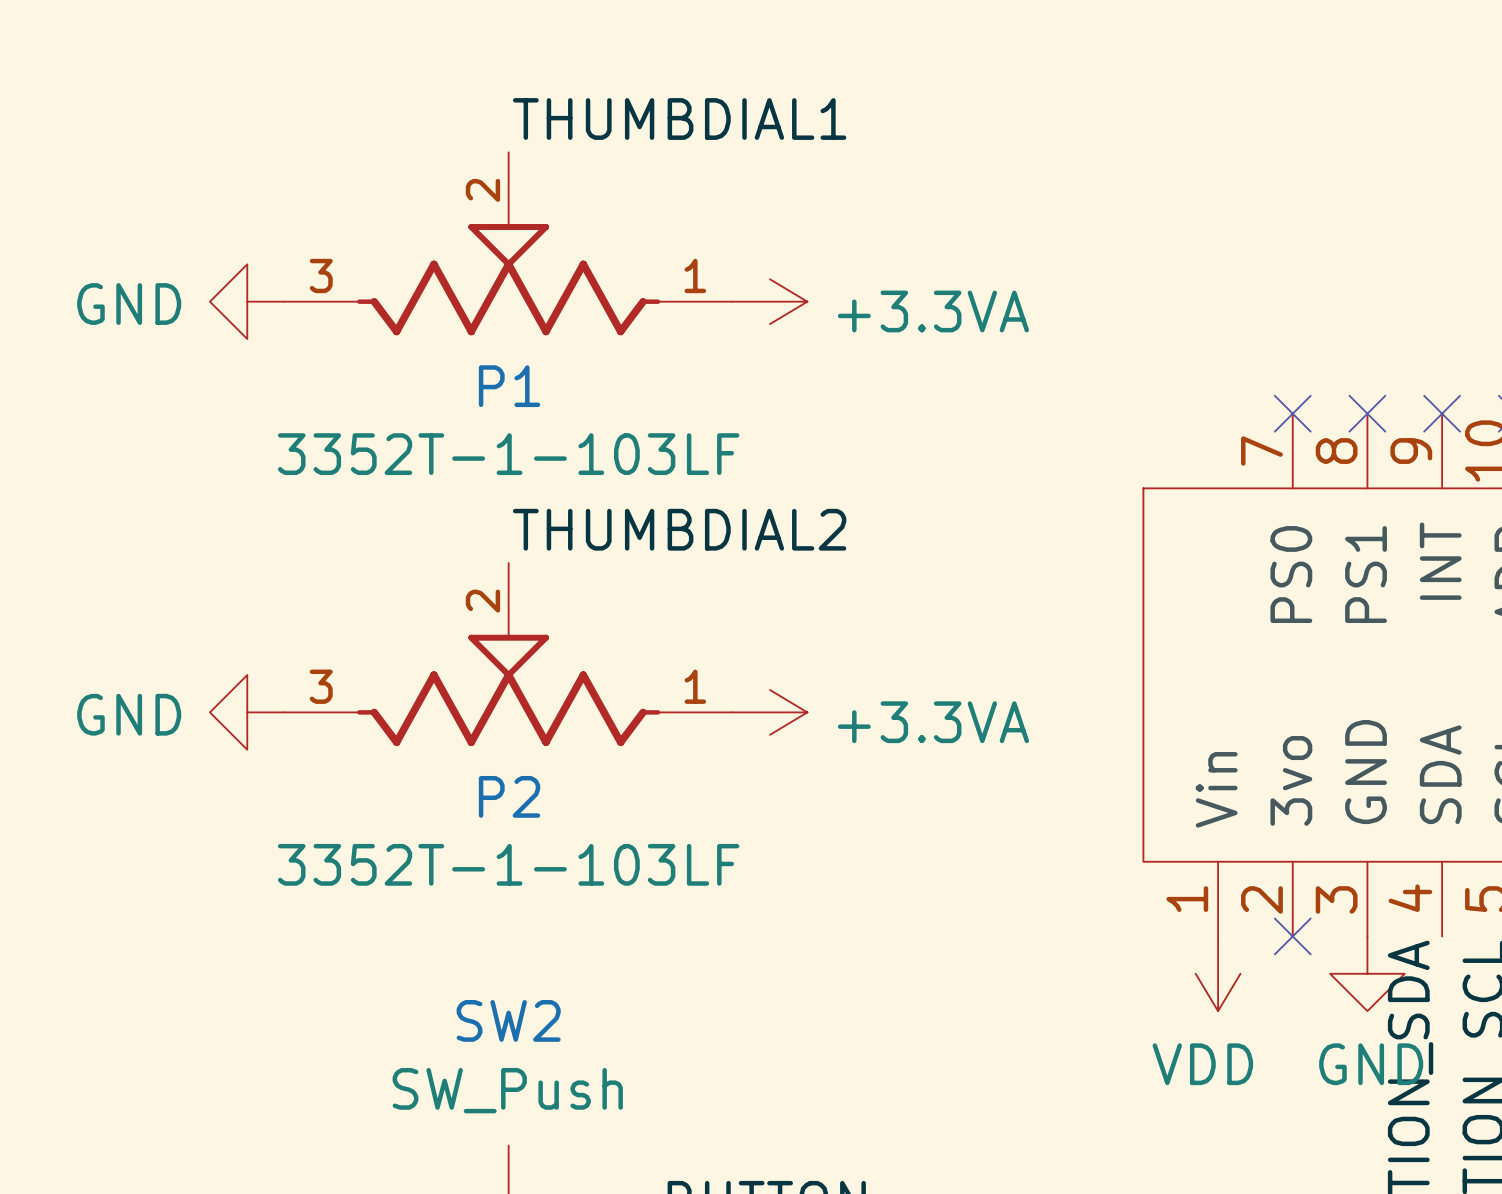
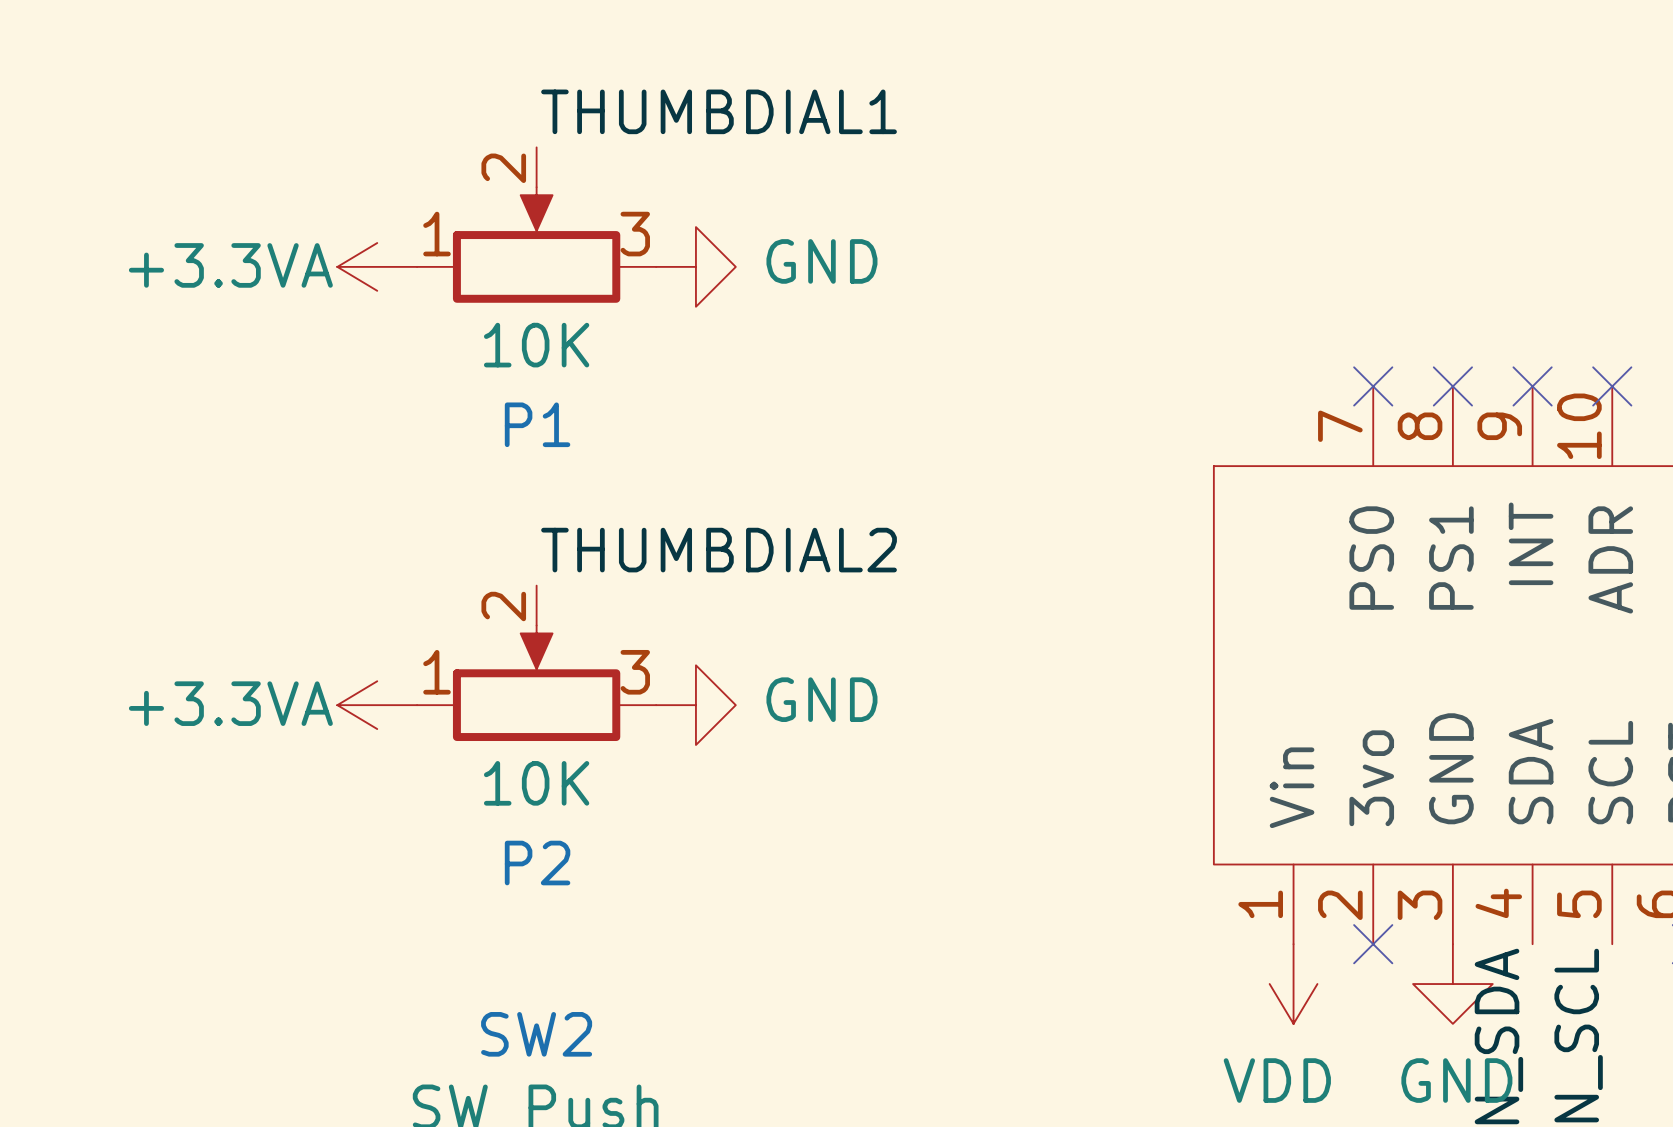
label position: THUMBDIAL1 (679, 119) -> THUMBDIAL1 (719, 111)
P1 symbol: [284, 152, 733, 336] -> [417, 147, 657, 303]
power symbol: GND (247, 301) -> none
power symbol: none -> +3.3VA (377, 266)
power symbol: none -> GND (695, 266)
power symbol: +3.3VA (770, 301) -> none
P1 value: 3352T-1-103LF (508, 454) -> 10K (536, 345)
label position: THUMBDIAL2 (679, 529) -> THUMBDIAL2 (719, 550)
P2 symbol: [284, 563, 733, 747] -> [417, 585, 657, 742]
power symbol: GND (247, 712) -> none
power symbol: none -> +3.3VA (377, 705)
power symbol: none -> GND (695, 705)
power symbol: +3.3VA (770, 712) -> none
P2 value: 3352T-1-103LF (508, 864) -> 10K (536, 783)

